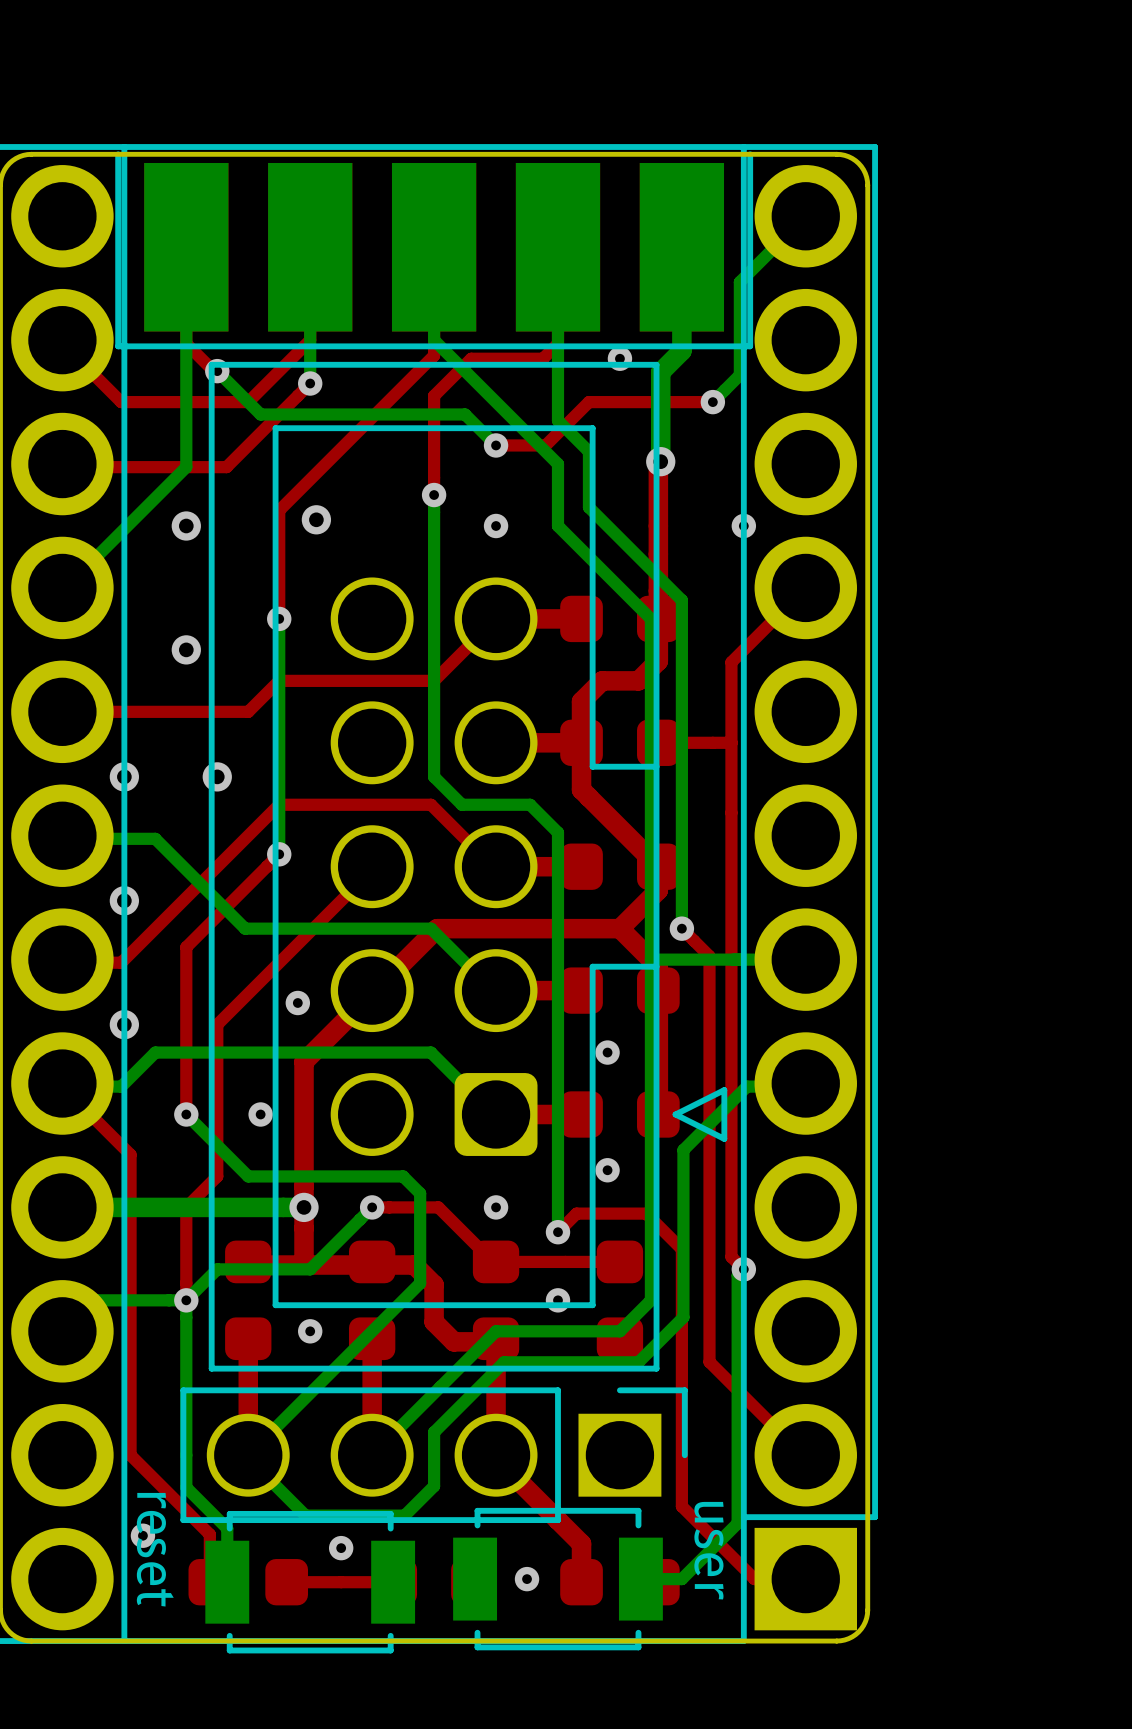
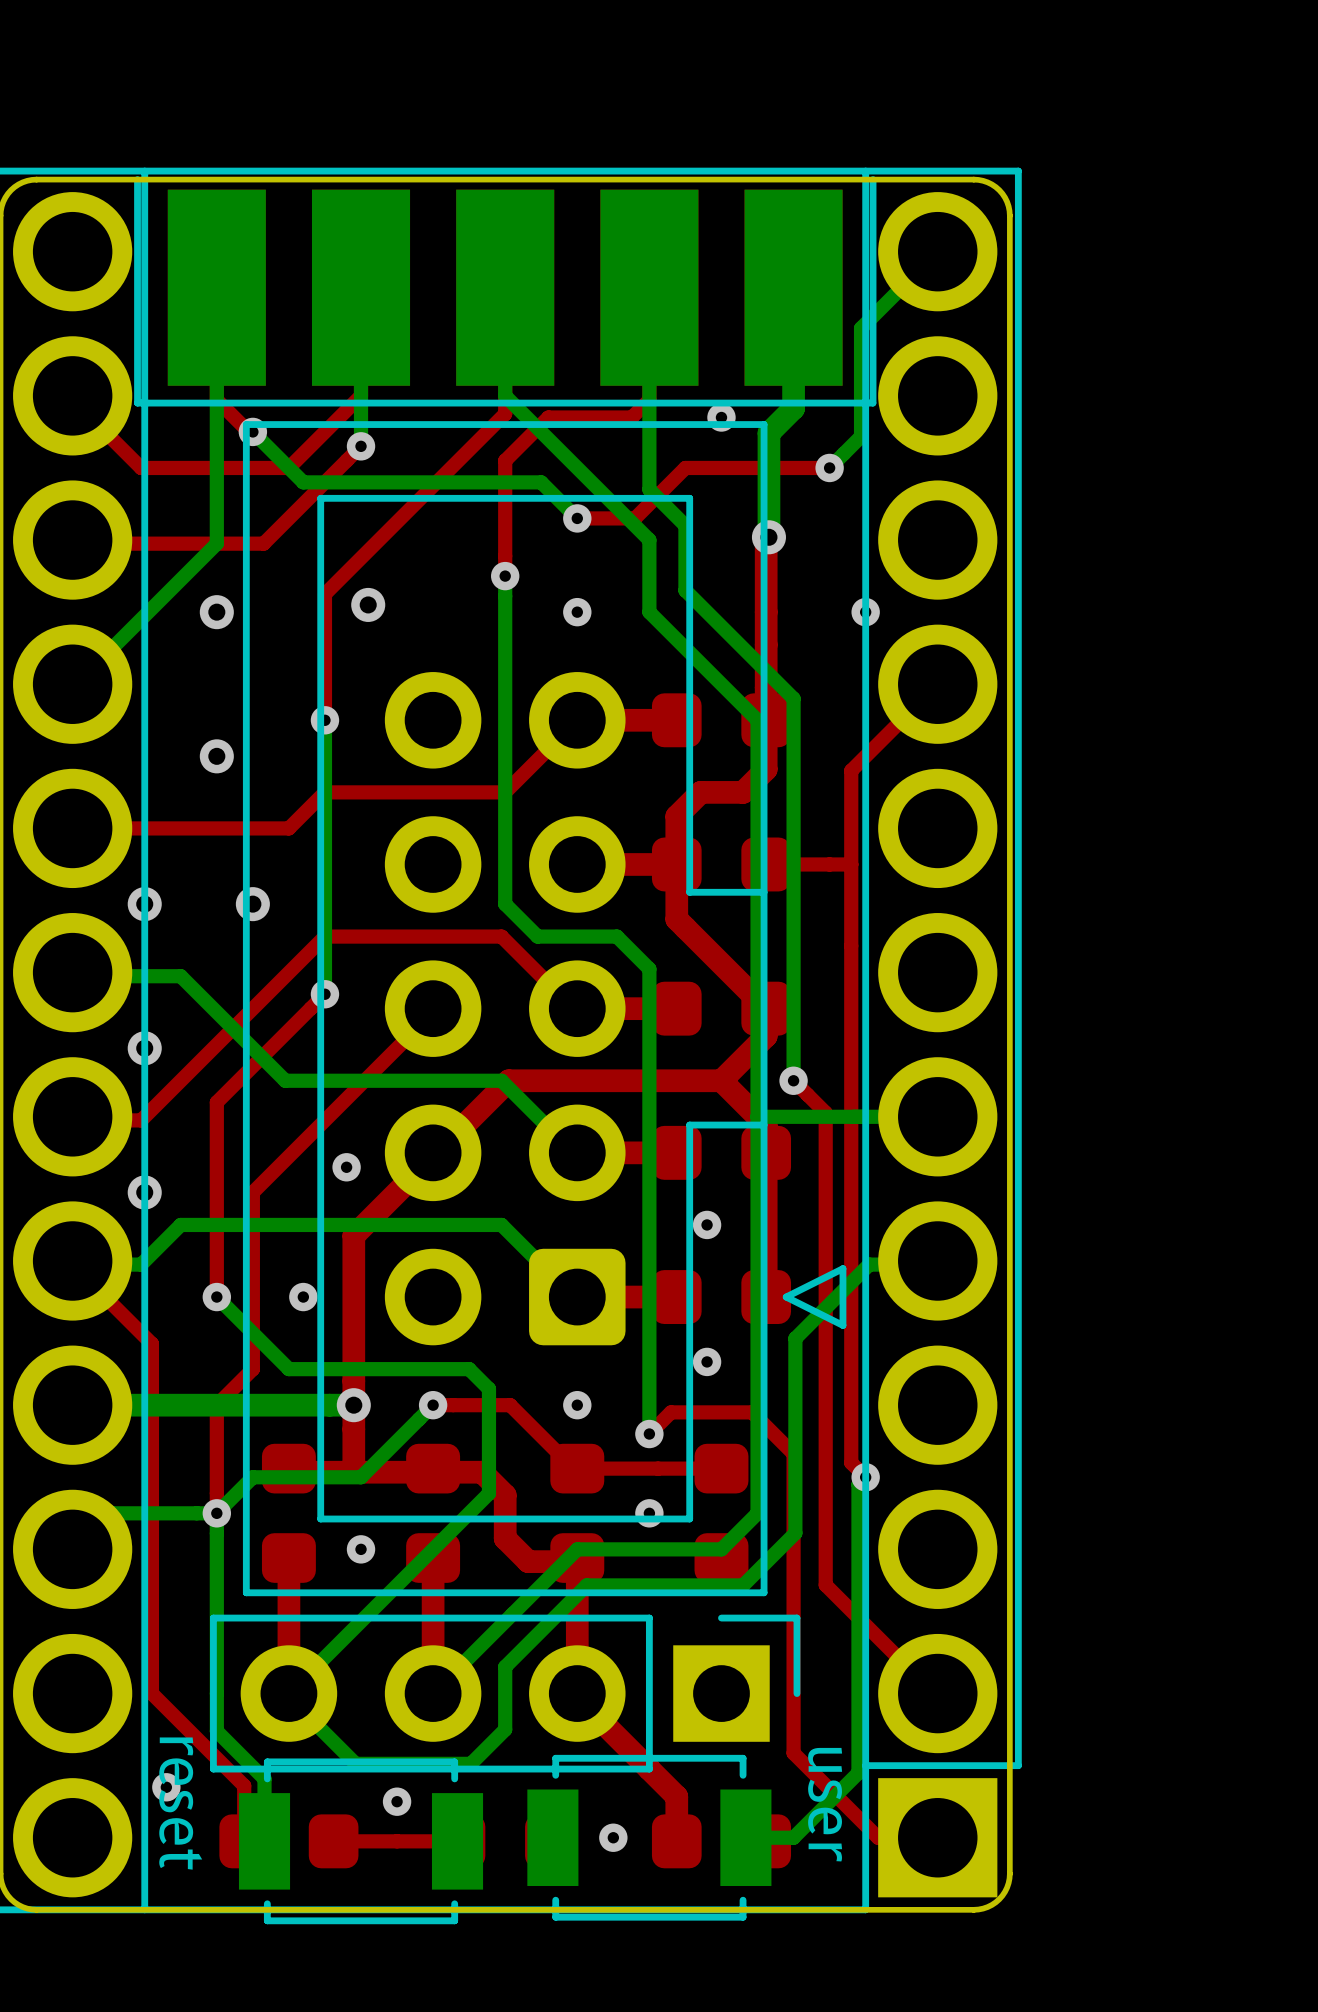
part footprint: [208, 361, 728, 1372] -> [242, 421, 847, 1597]
part footprint: [180, 1387, 688, 1524] -> [210, 1614, 801, 1773]

